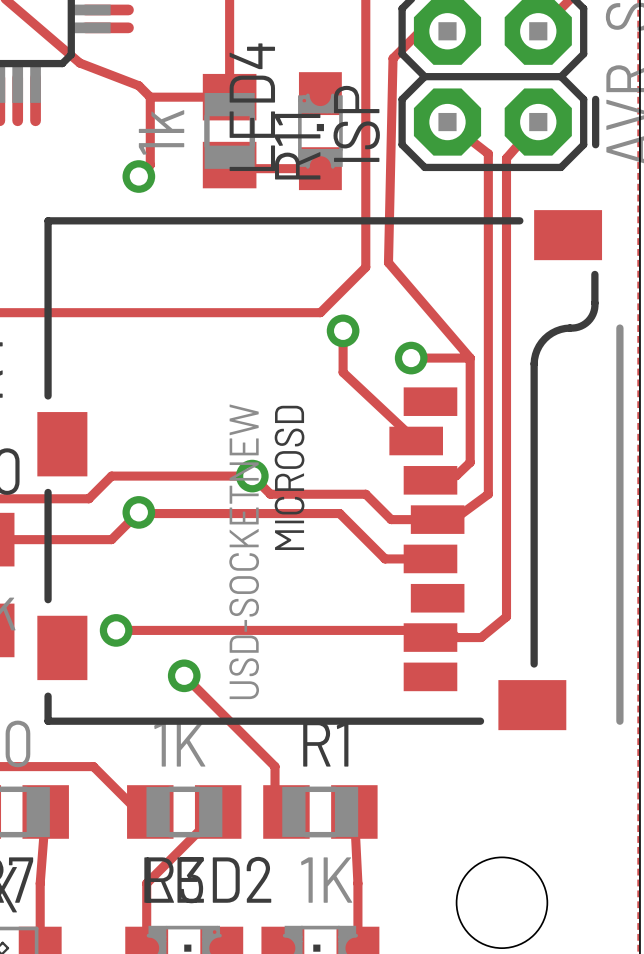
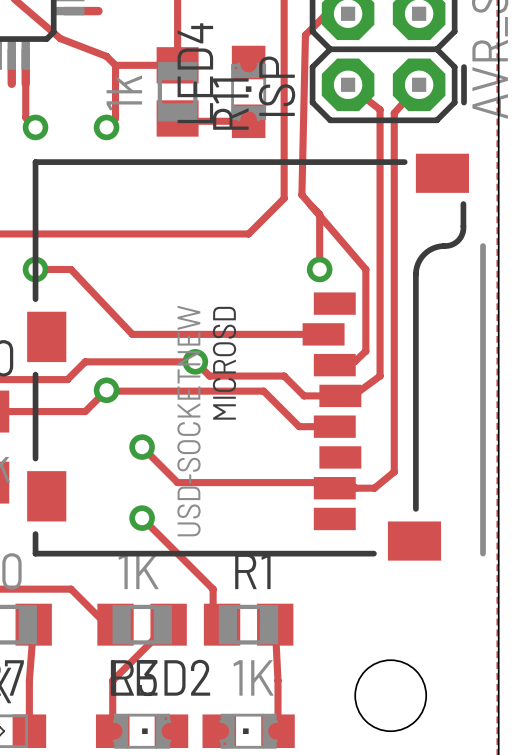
track: none -> (25, 67) (25, 117) (35, 127)
via: none -> (35, 127)
track: (343, 330) (343, 372) (416, 440) -> (35, 269) (71, 269) (132, 334) (323, 334)
via: (343, 330) -> none
via: none -> (35, 269)
track: (411, 358) (470, 358) -> (319, 269) (319, 214) (311, 205)
track: (116, 630) (229, 630) -> (142, 447) (177, 482)
via position: (116, 630) -> (142, 447)

